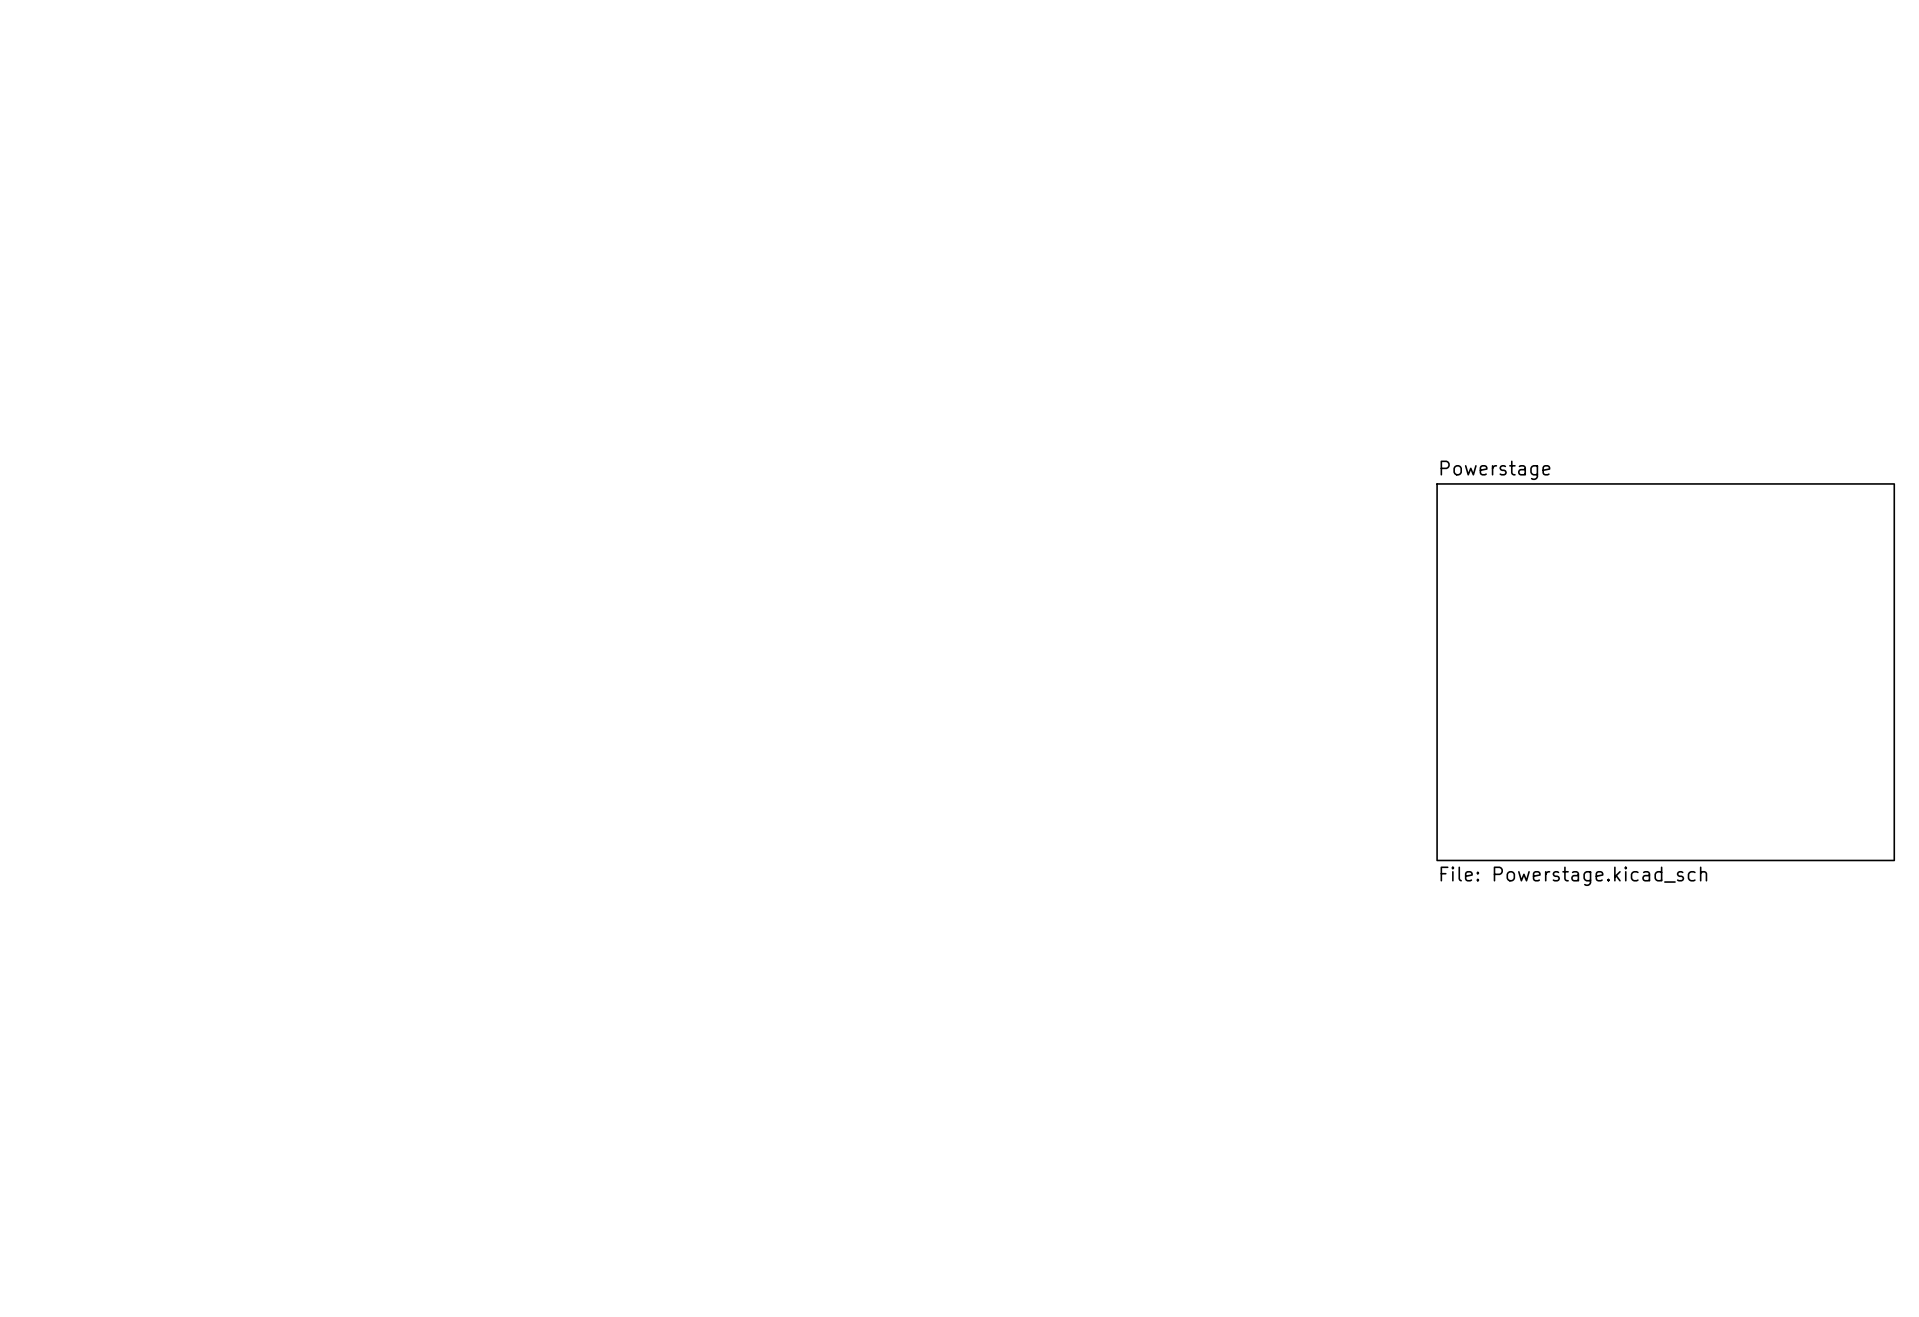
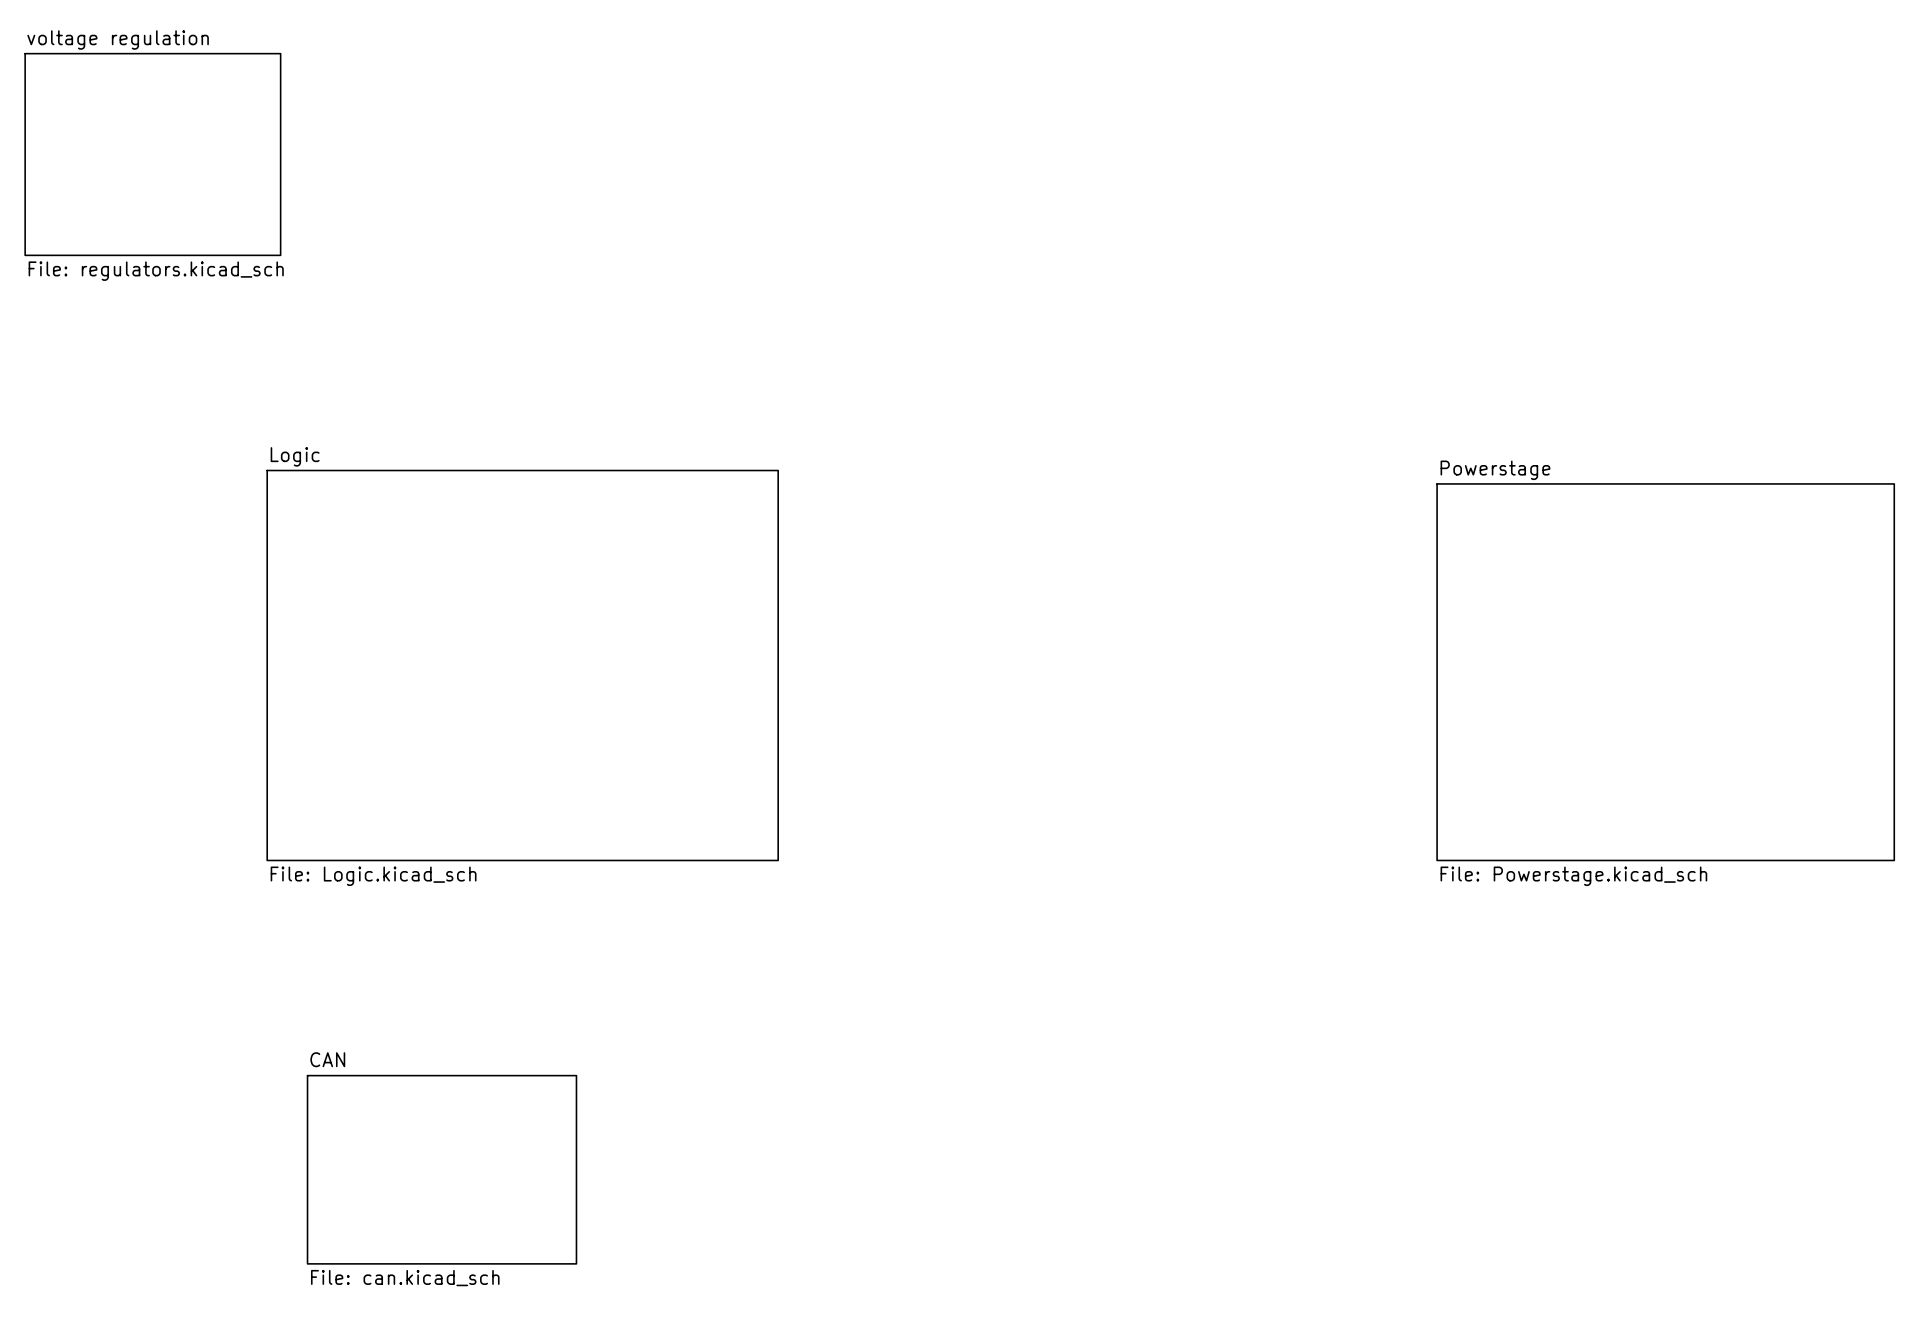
sheet voltage regulation: none -> File: regulators.kicad_sch (152, 154)
sheet Logic: none -> File: Logic.kicad_sch (522, 665)
sheet CAN: none -> File: can.kicad_sch (442, 1169)

